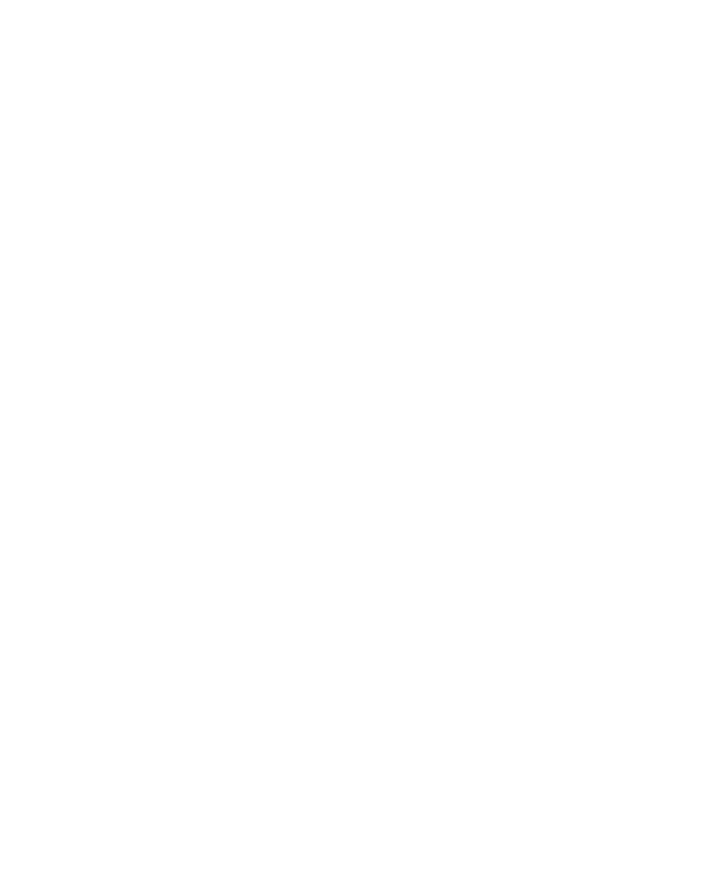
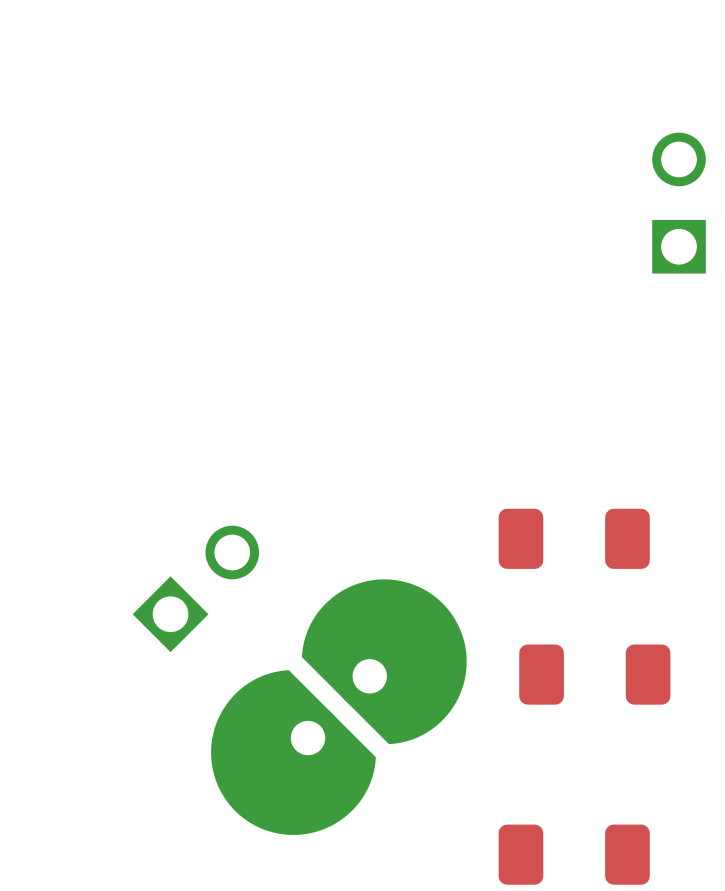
part: none -> (679, 203)
part: none -> (574, 538)
part: none -> (195, 588)
part: none -> (594, 674)
part: none -> (338, 707)
part: none -> (574, 854)

